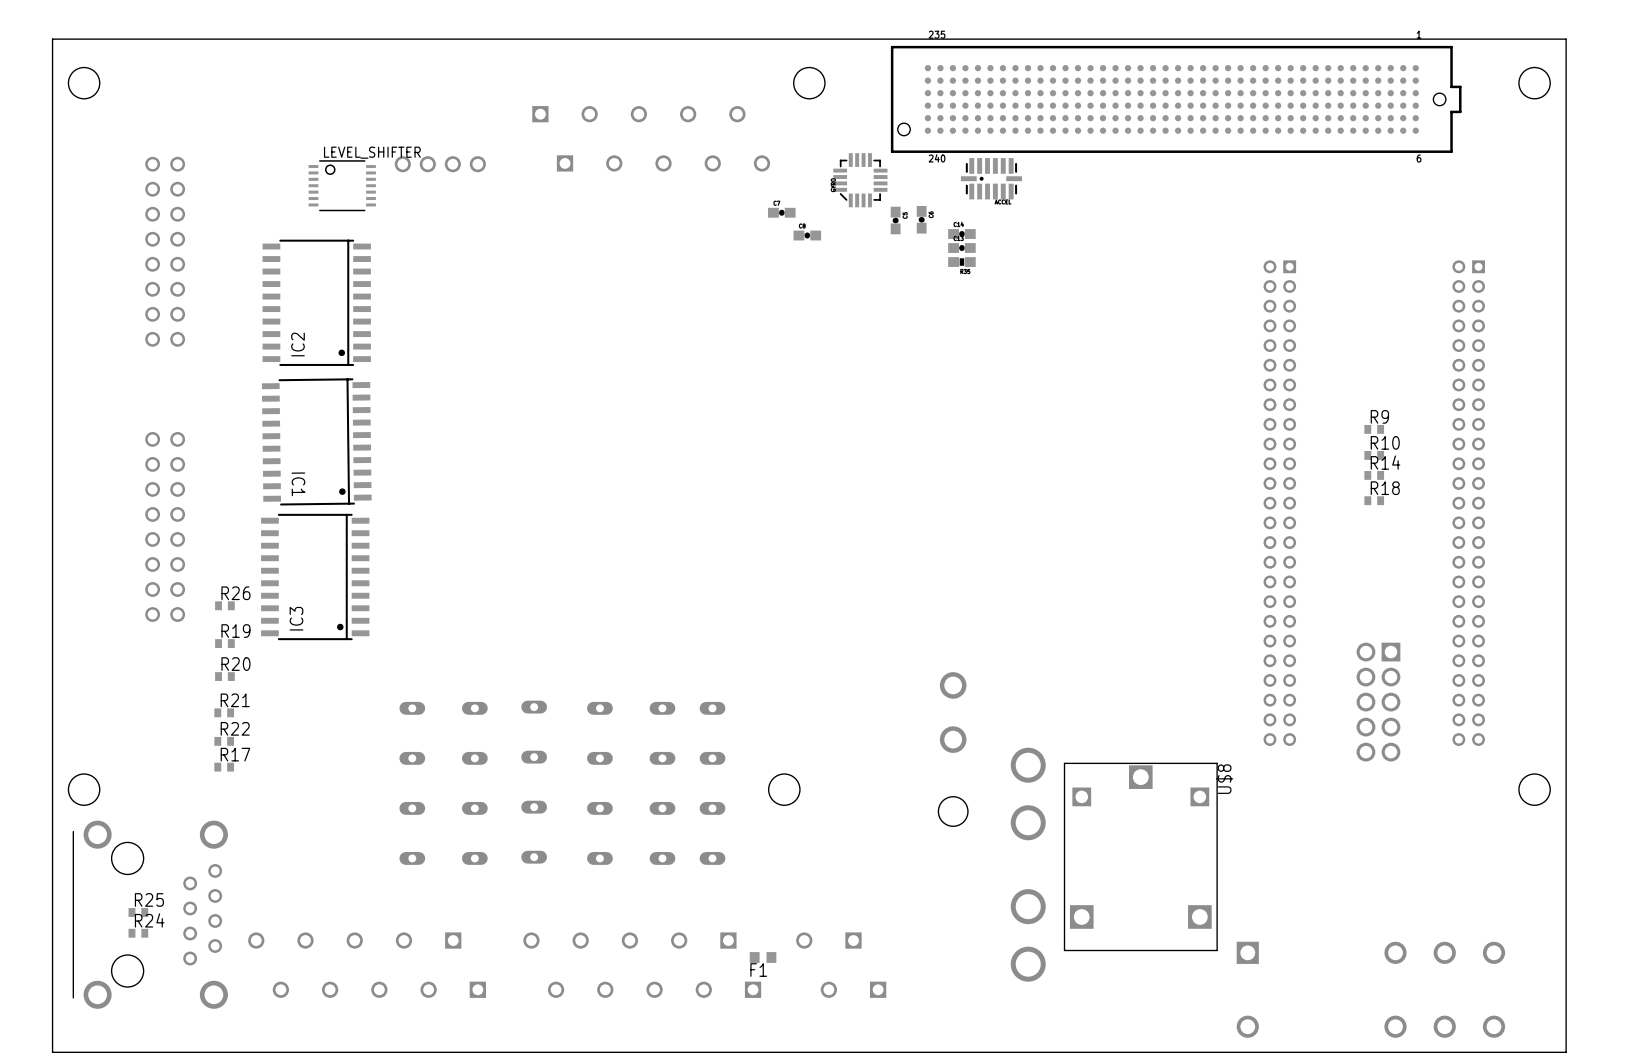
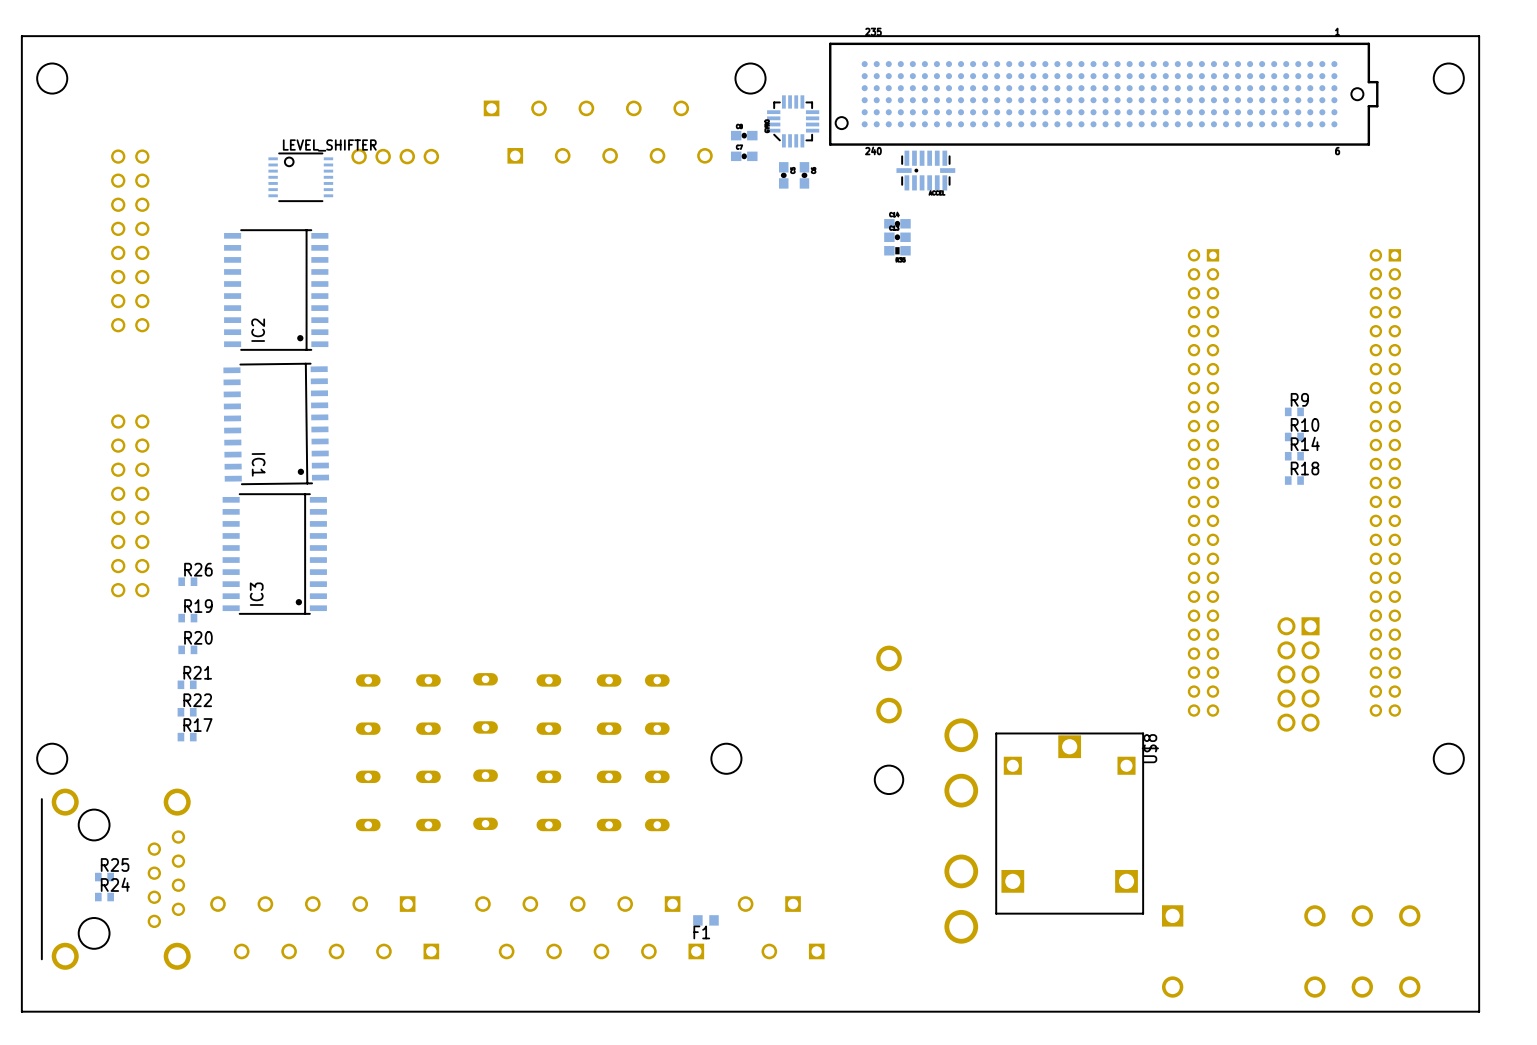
part position: (860, 180) -> (793, 121)
part position: (781, 212) -> (744, 156)
part position: (921, 219) -> (804, 175)
part position: (895, 220) -> (783, 175)
part position: (807, 235) -> (744, 135)

